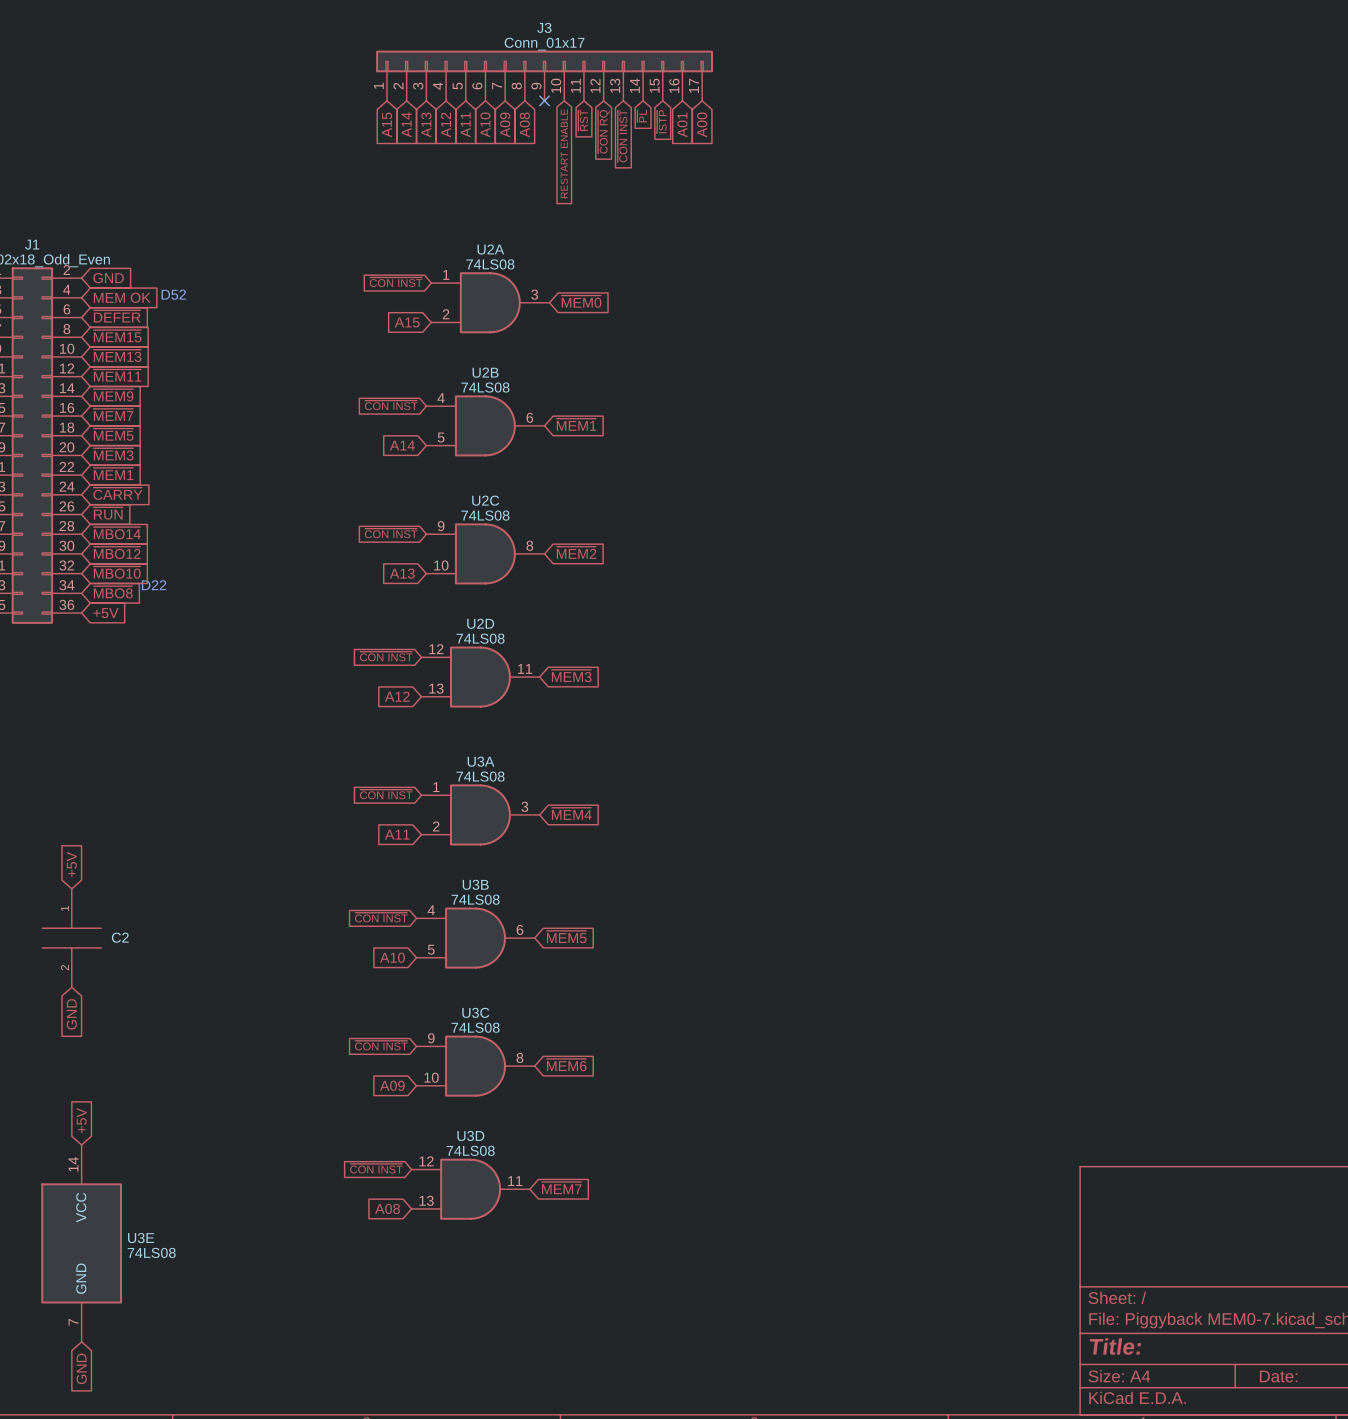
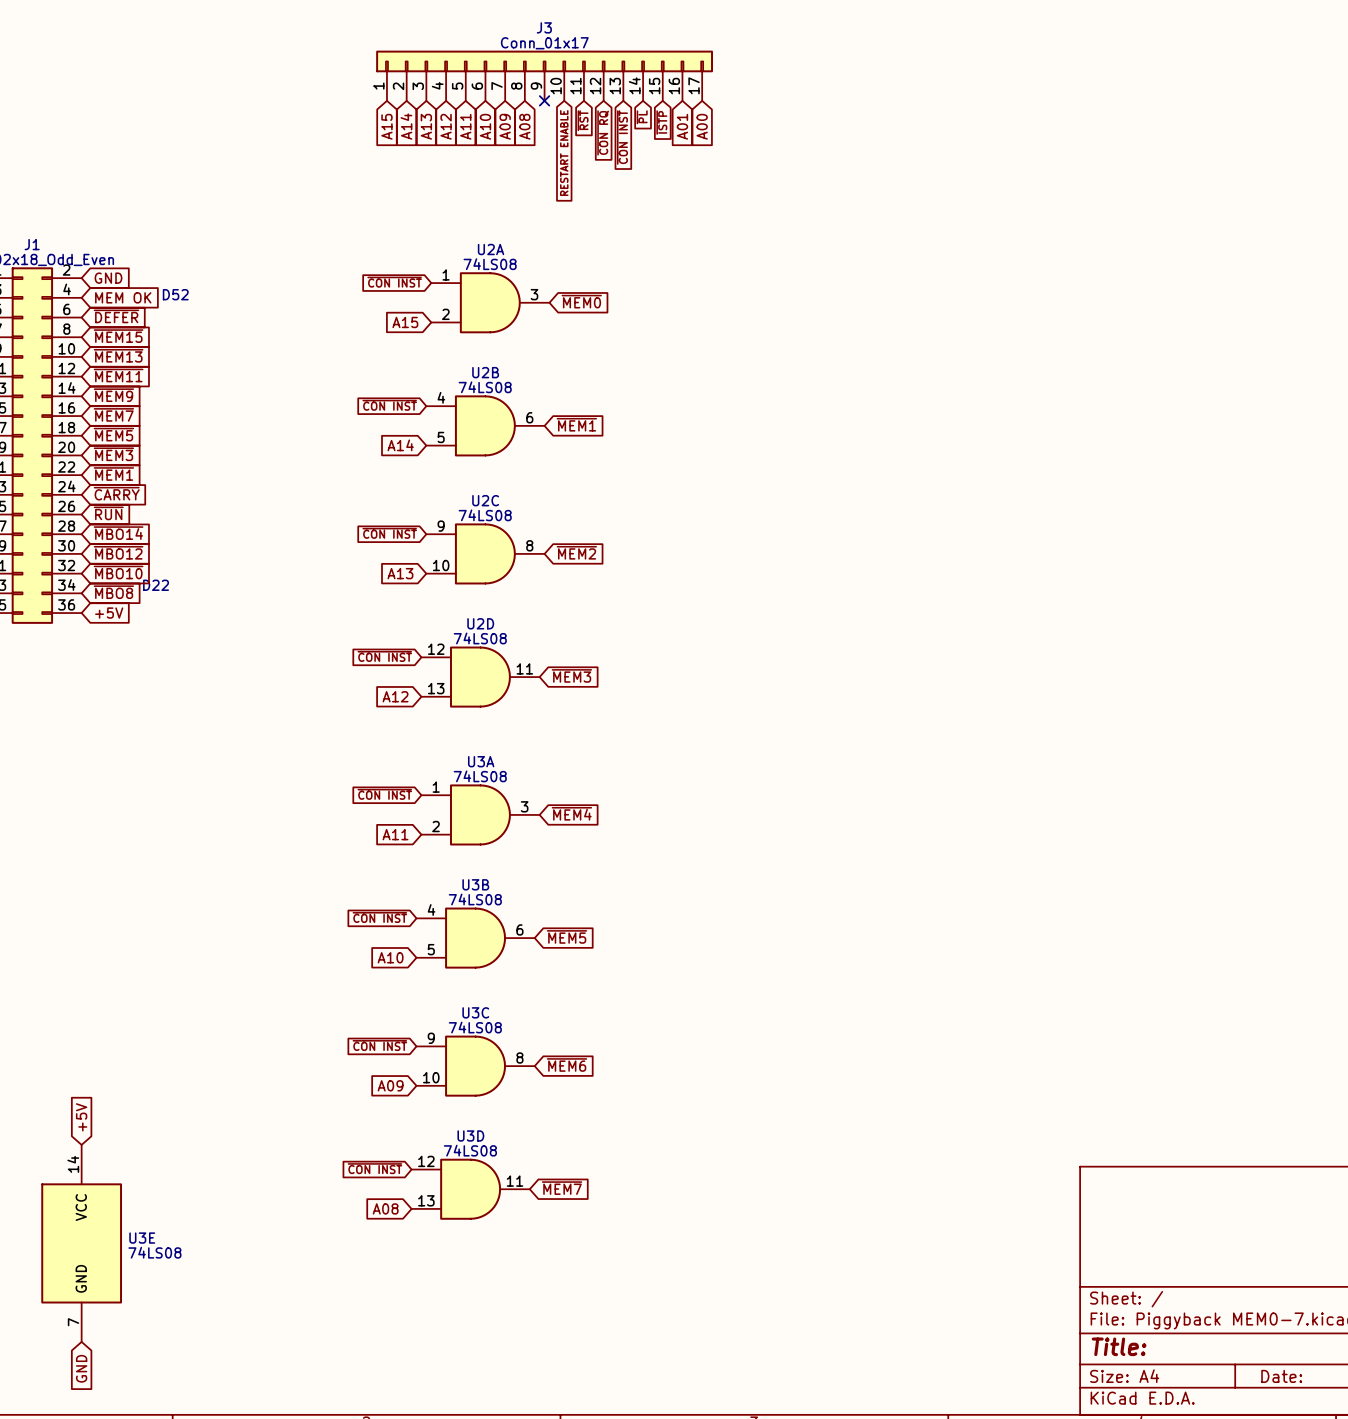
global label: +5V (71, 864) -> none
C2: (71, 938) -> none
global label: GND (71, 1014) -> none

